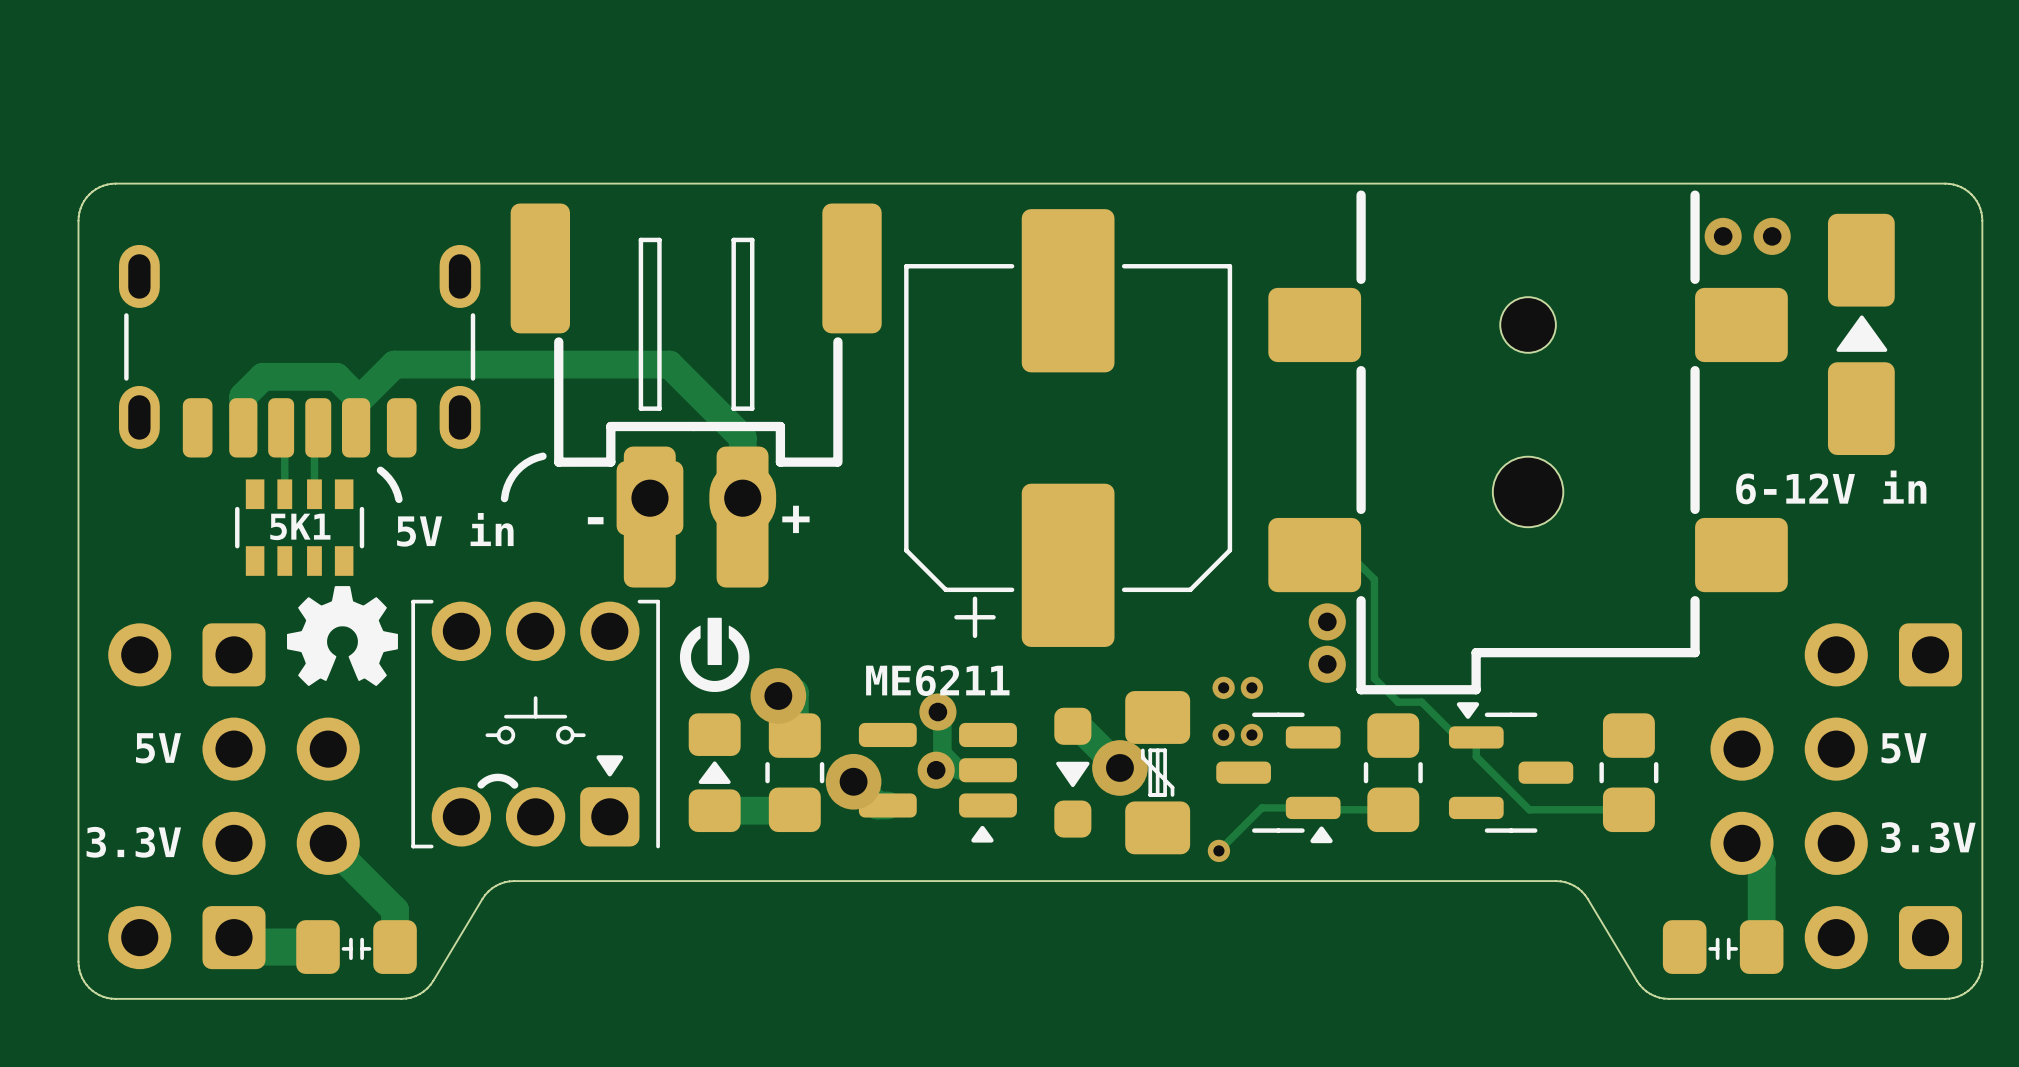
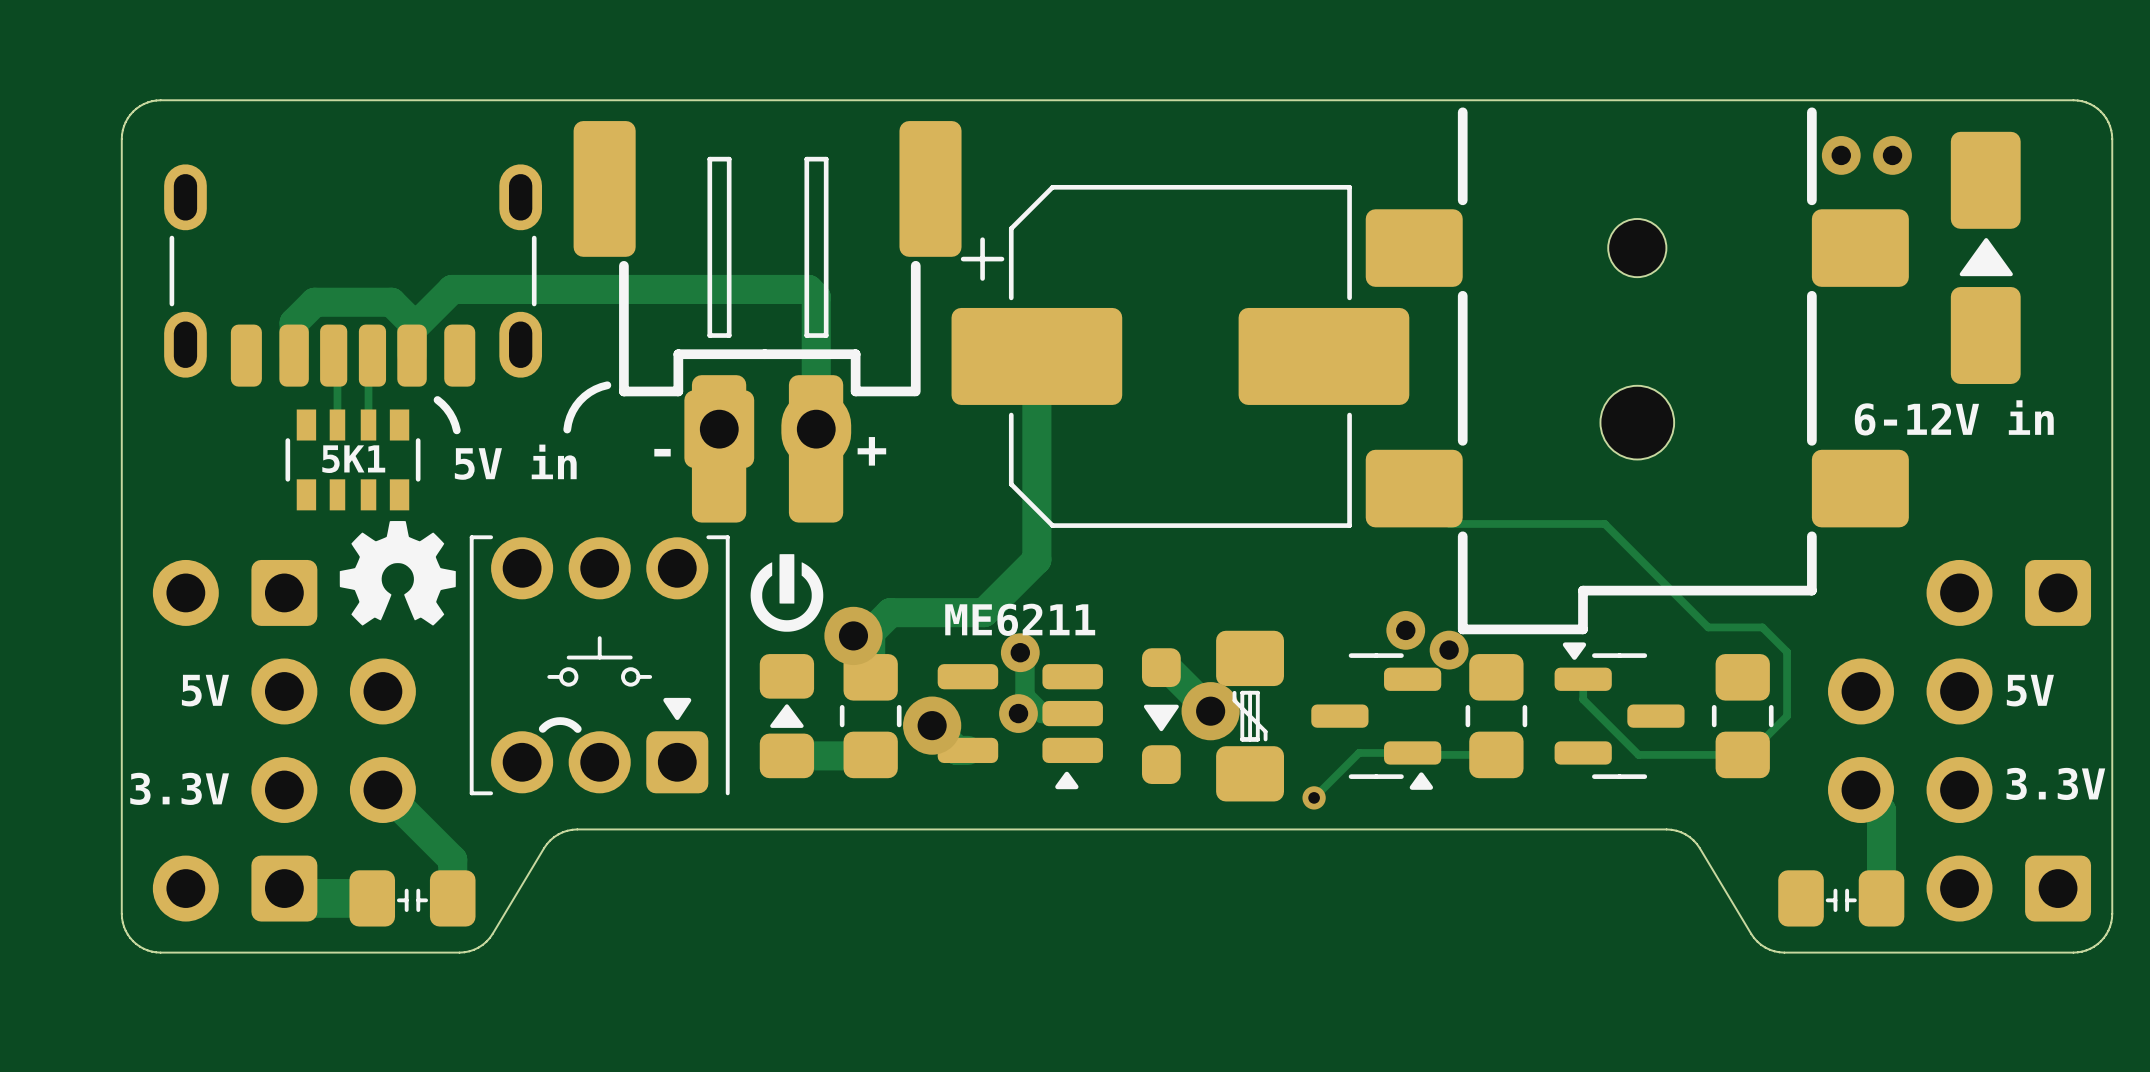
track: (669, 364) (742, 437) -> (739, 289) (808, 289) (816, 297) (816, 366)
track: none -> (1036, 356) (1036, 559) (984, 612) (890, 612) (870, 632)
part rotation: 0° (1068, 428) -> 90° clockwise (1180, 356)
track: (1314, 555) (1350, 555) (1374, 579) (1374, 678) (1398, 702) (1421, 702) (1457, 737) (1476, 737) -> (1414, 488) (1449, 523) (1604, 523) (1708, 627) (1762, 627) (1787, 652) (1787, 716) (1748, 754) (1742, 754)
via: (1327, 621) -> none
via position: (1327, 664) -> (1405, 630)
via: (1223, 687) -> none
via: (1251, 687) -> none
via: none -> (1449, 650)
via: (1223, 734) -> none
via: (1251, 734) -> none

